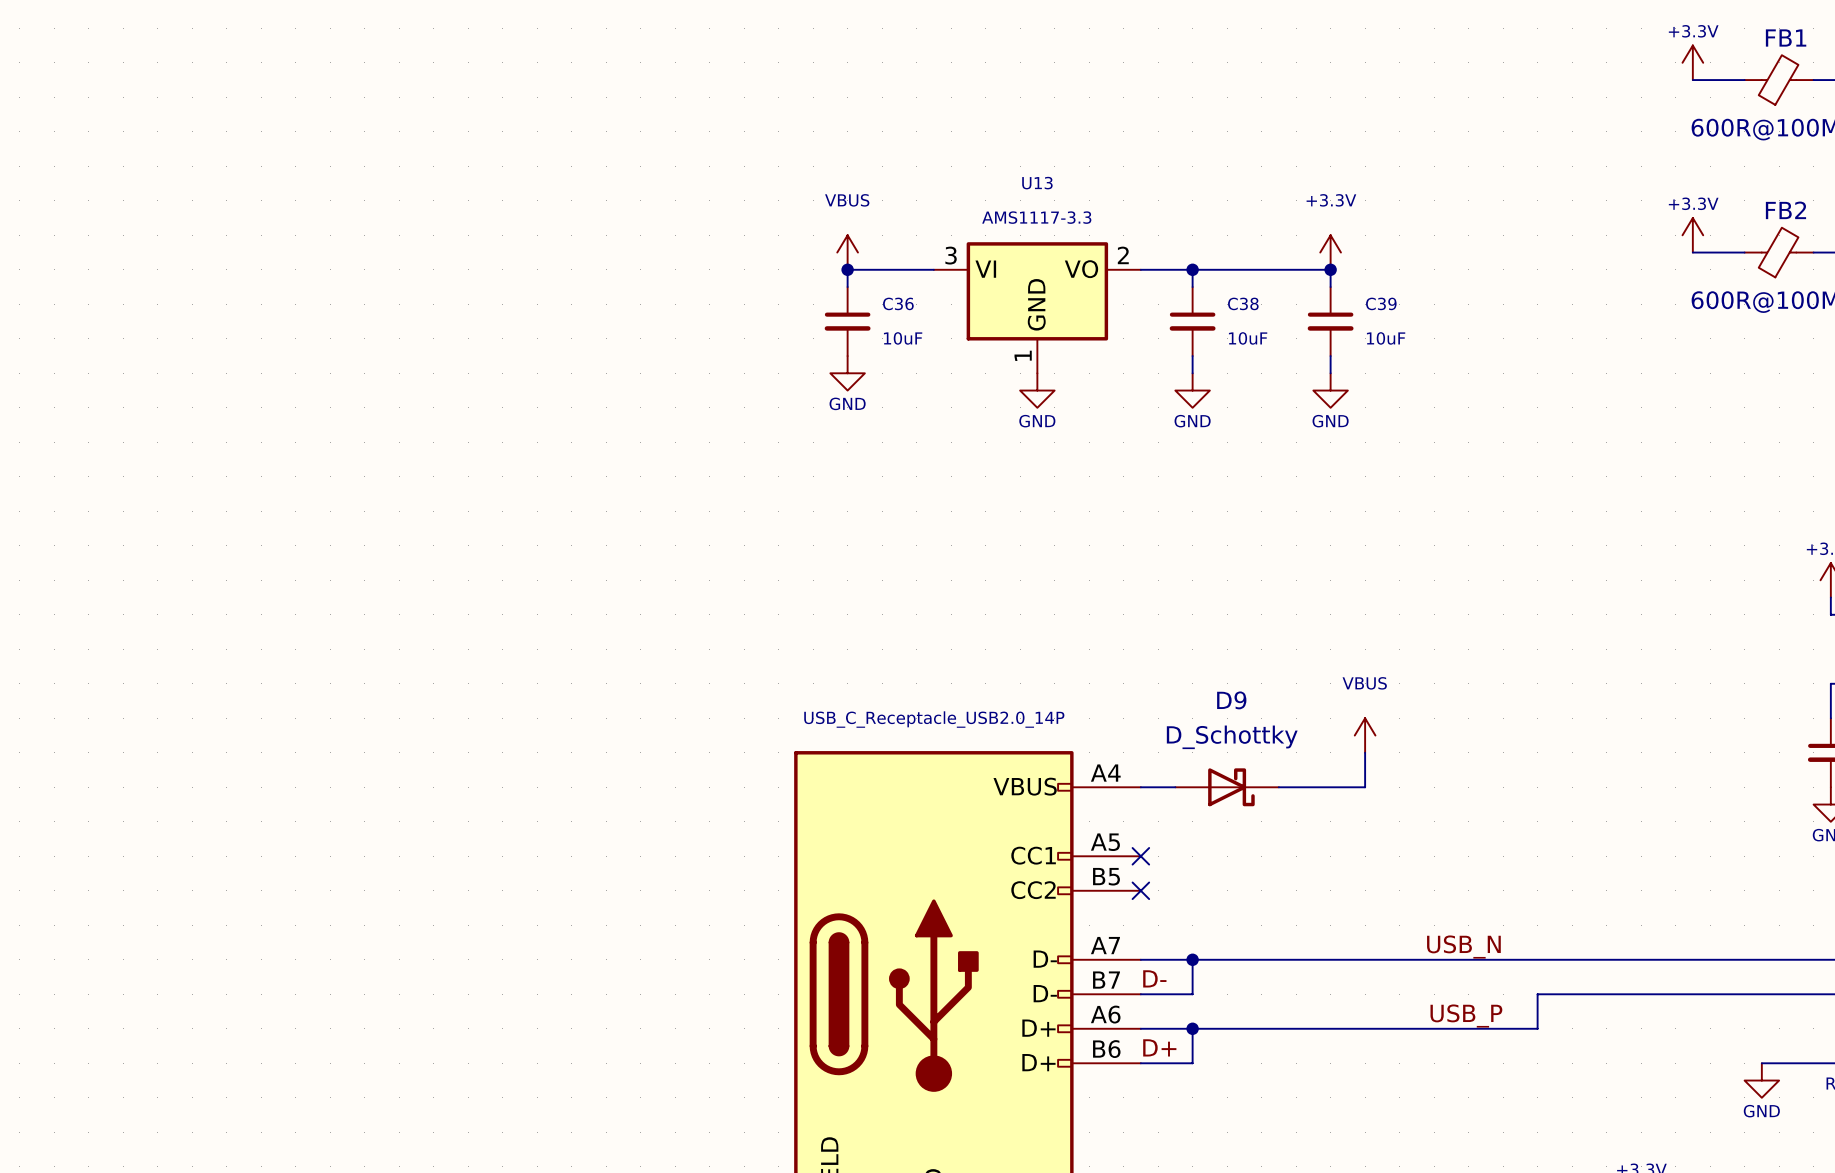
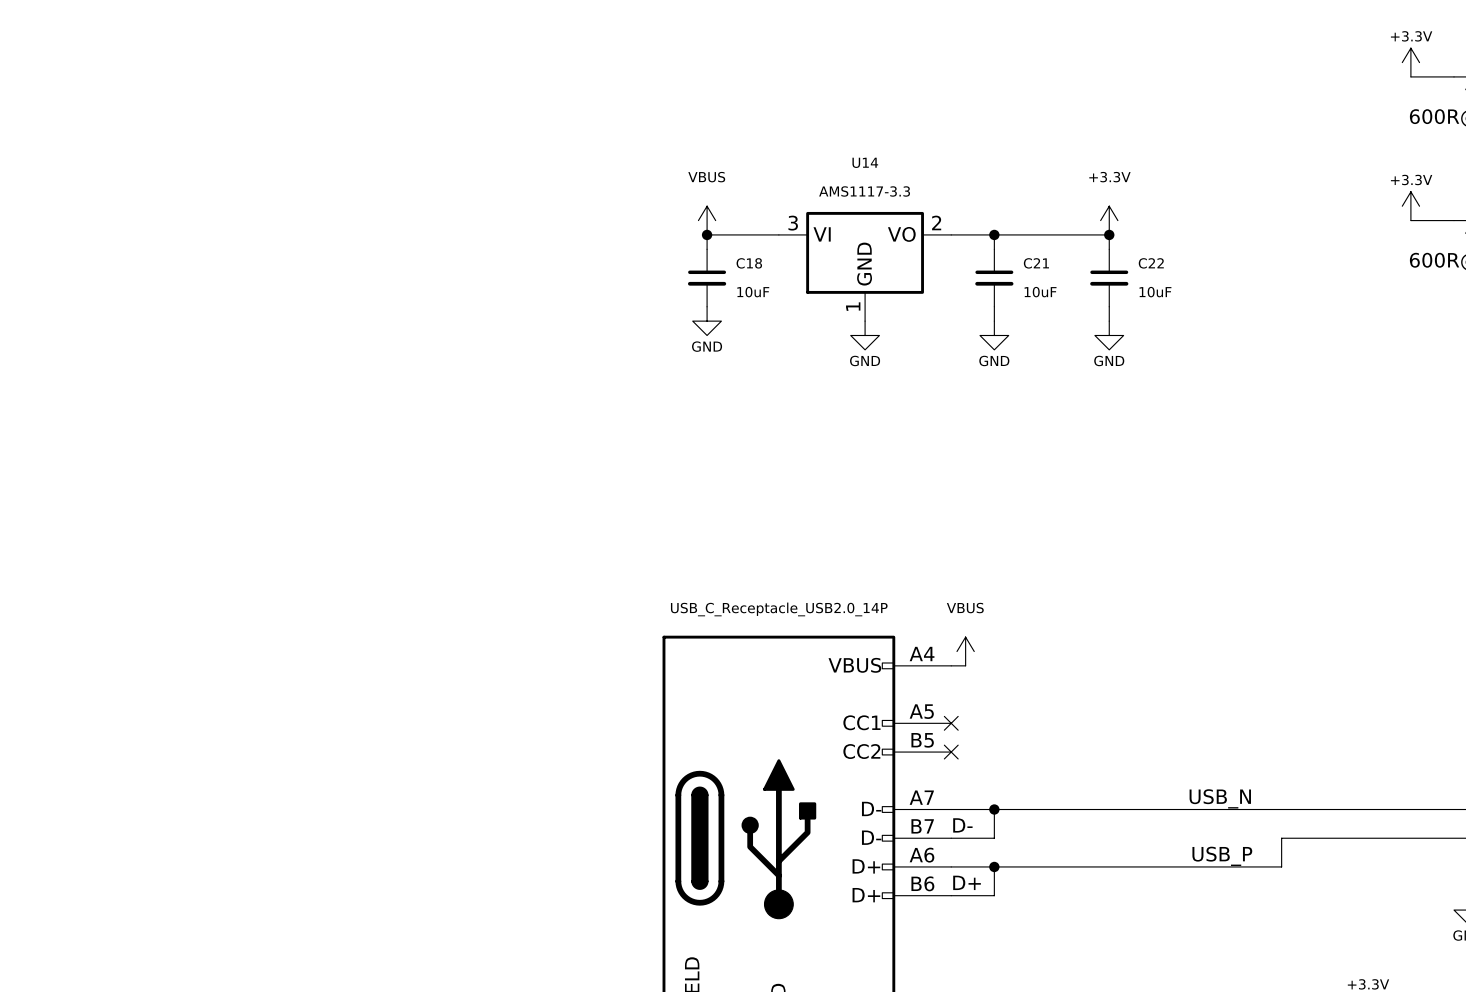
U13 name: U13 (1037, 183) -> U14 (865, 162)
C36 name: C36 (898, 303) -> C18 (749, 263)
C38 name: C38 (1243, 303) -> C21 (1036, 263)
C39 name: C39 (1381, 303) -> C22 (1151, 263)
power symbol position: VBUS (1365, 735) -> VBUS (965, 651)
wire: (1365, 752) (1365, 787) (1278, 787) -> none
wire: (1158, 787) (1175, 787) -> none
D9: D_Schottky (1227, 787) -> none

